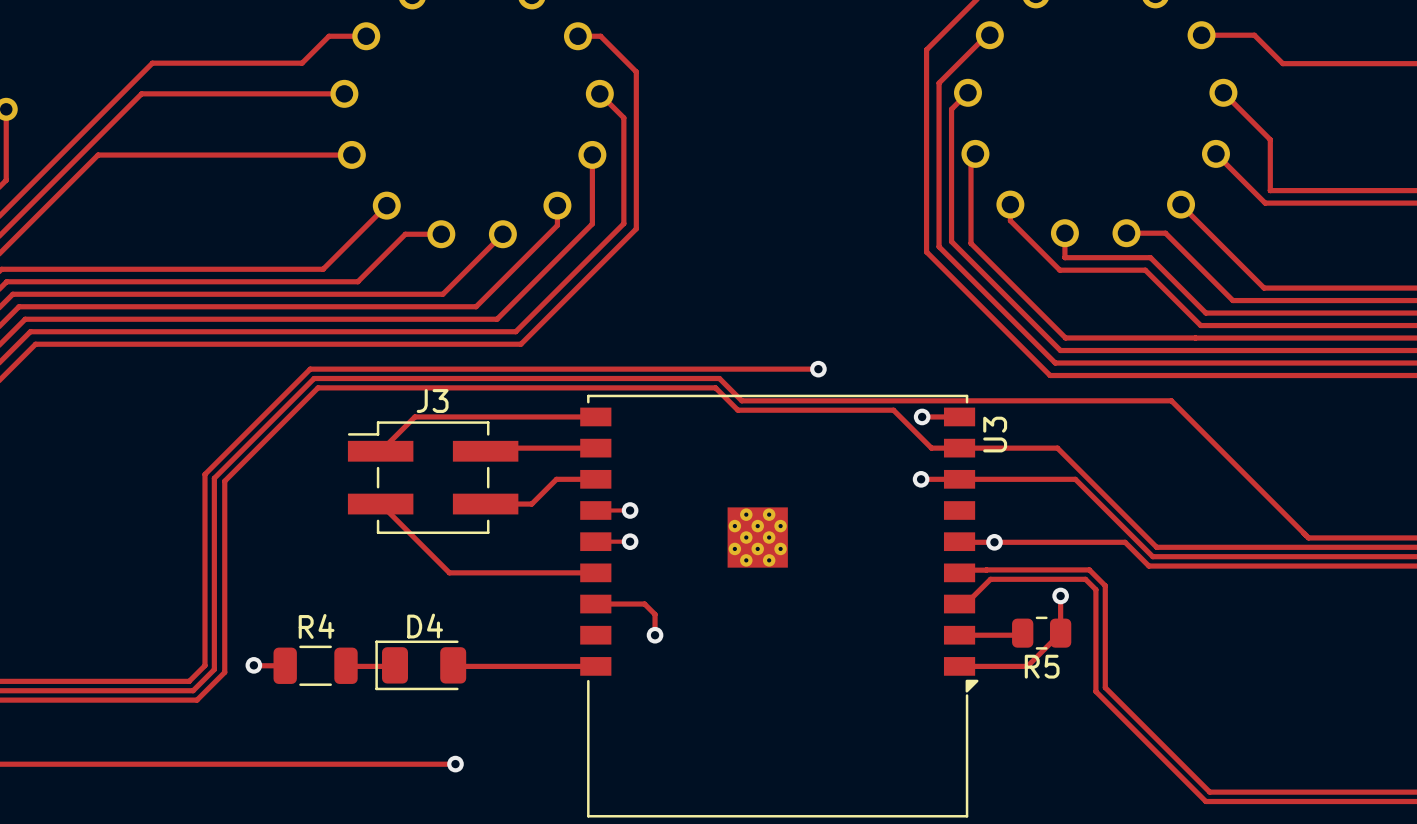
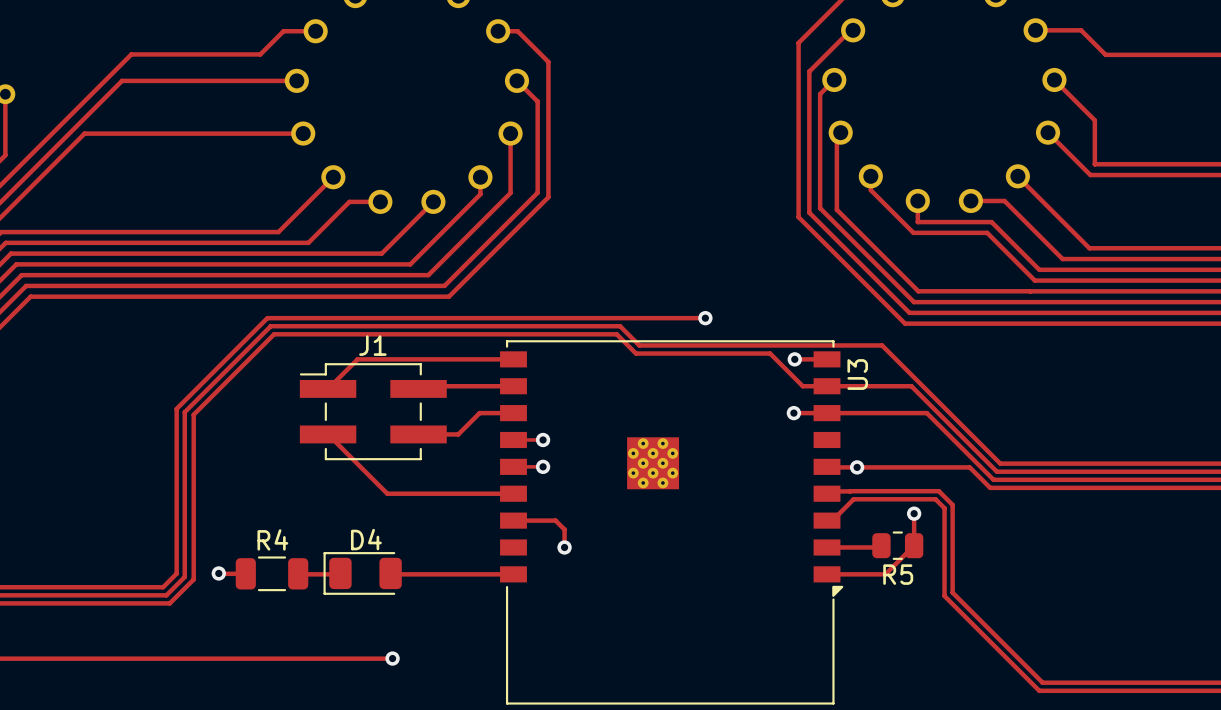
track: (1023, 400) (1171, 400) (1308, 537) -> (882, 345) (1000, 463) (1127, 463)
J3 name: J3 (432, 401) -> J1 (372, 345)

